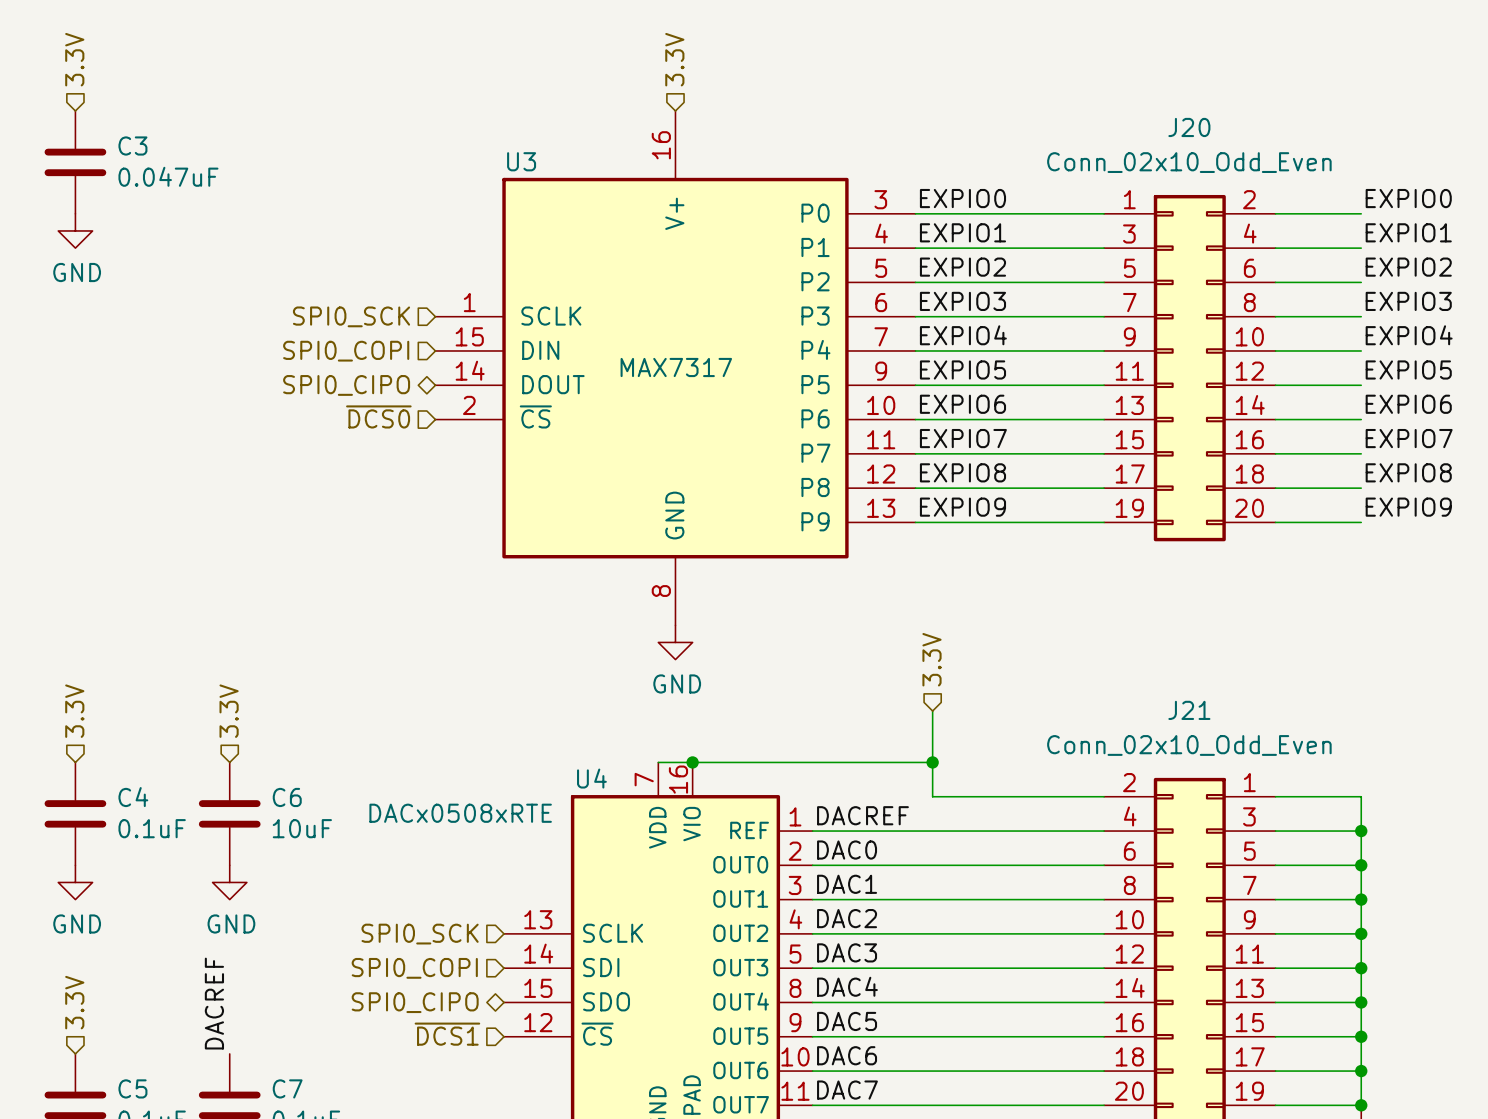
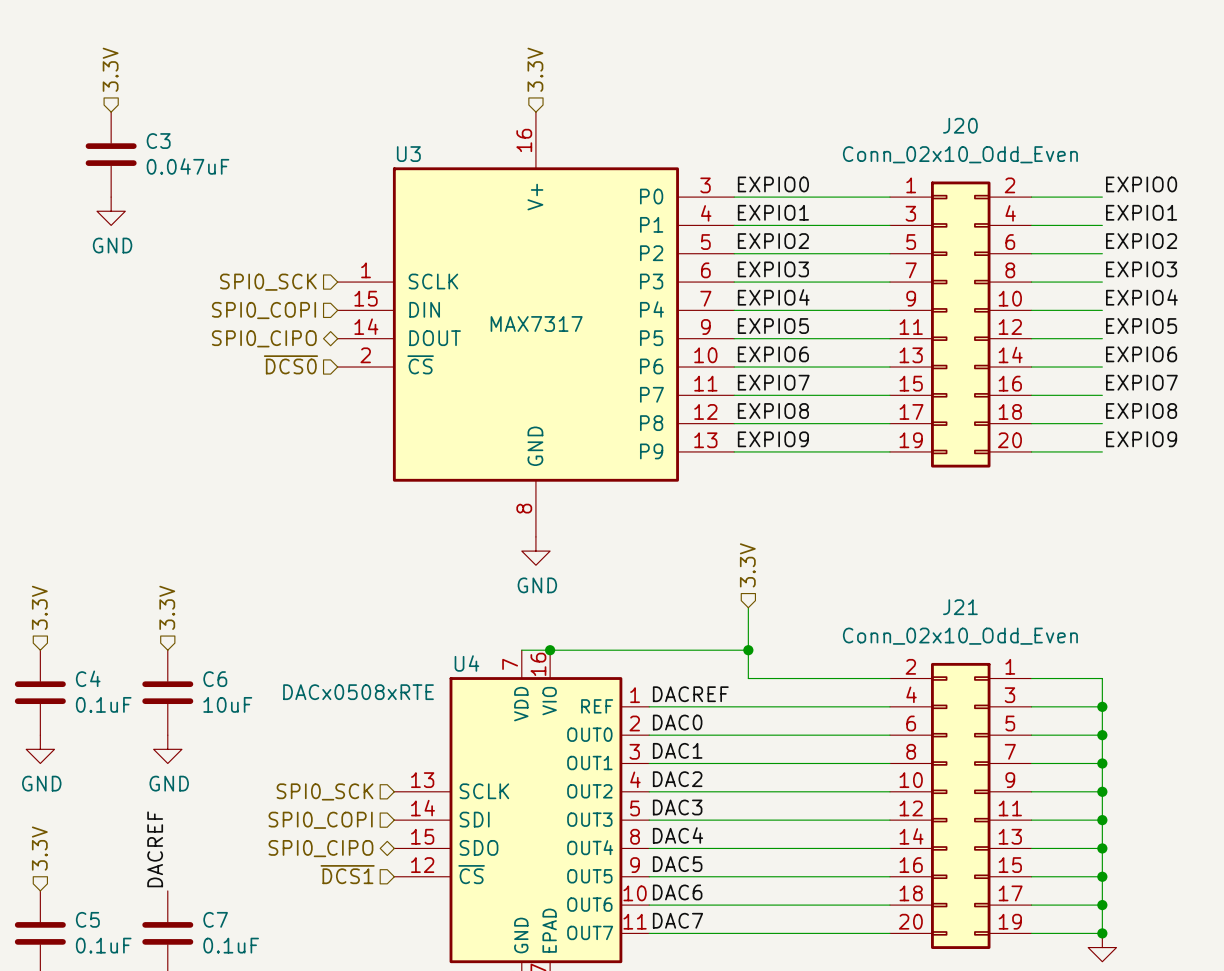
hierarchical label position: 3.3V (74, 59) -> 3.3V (110, 69)
C3 position: (75, 162) -> (111, 154)
power symbol position: GND (75, 230) -> GND (111, 211)

